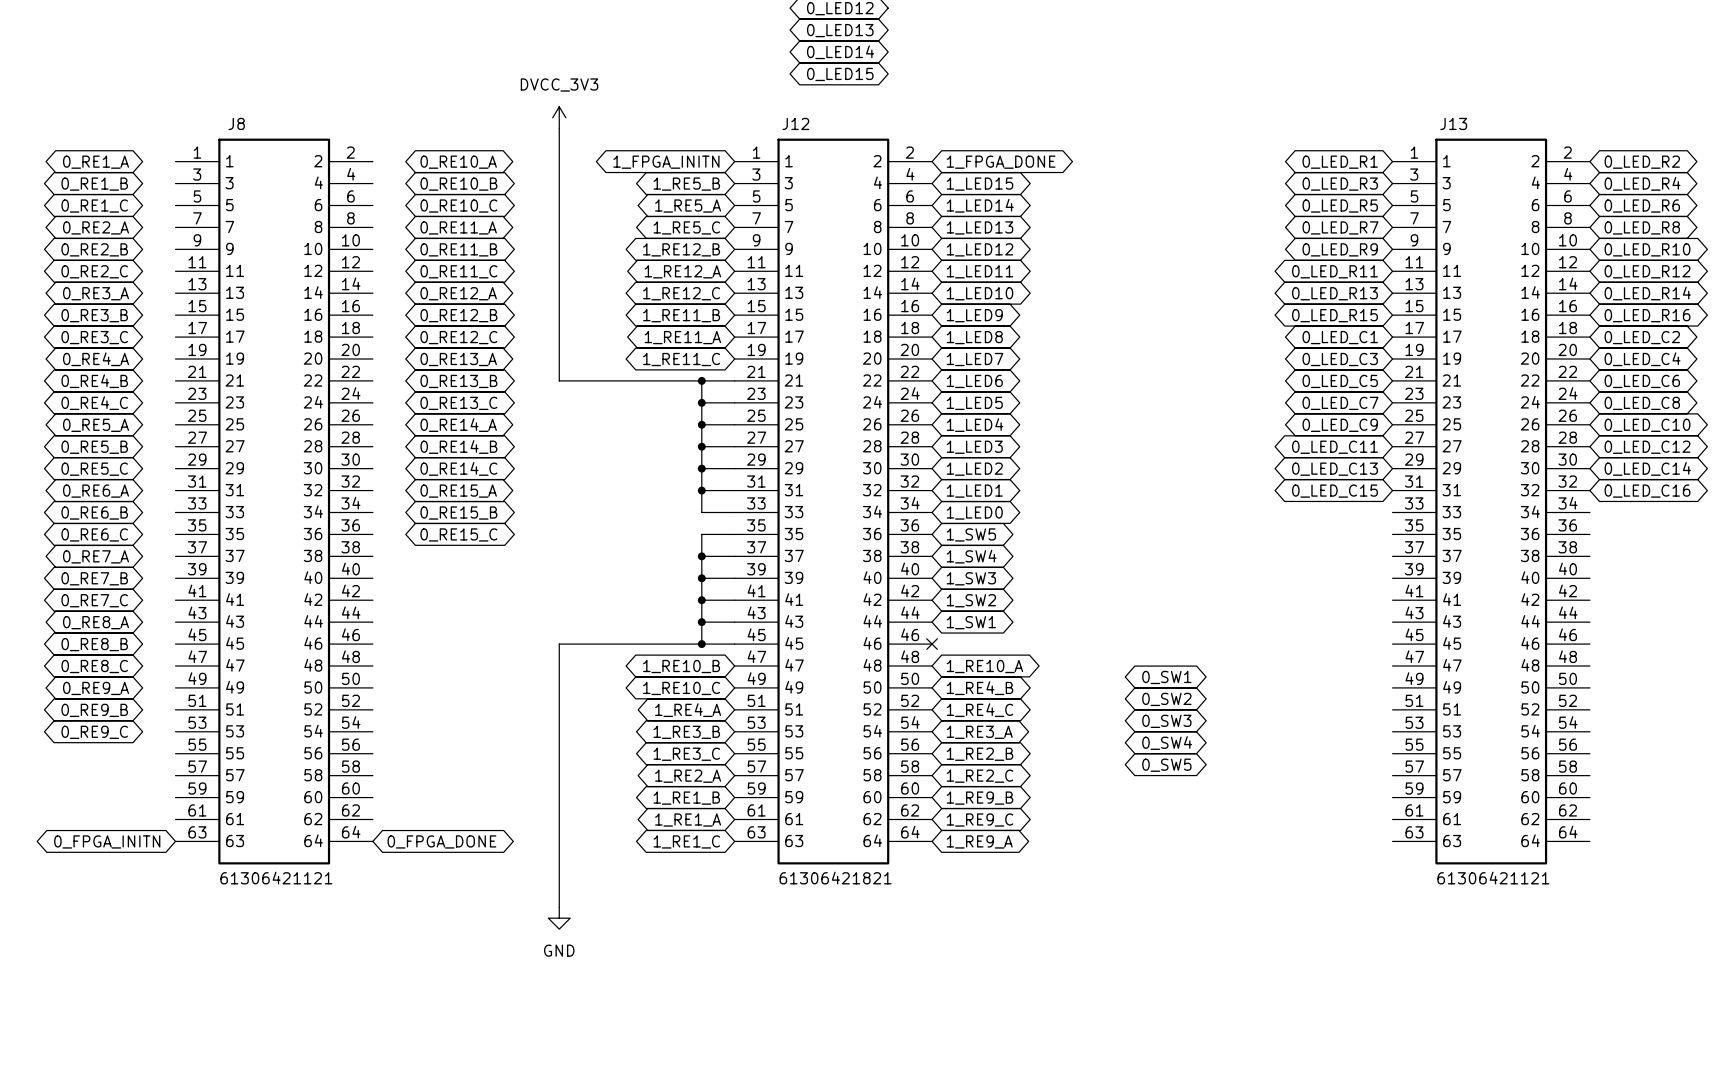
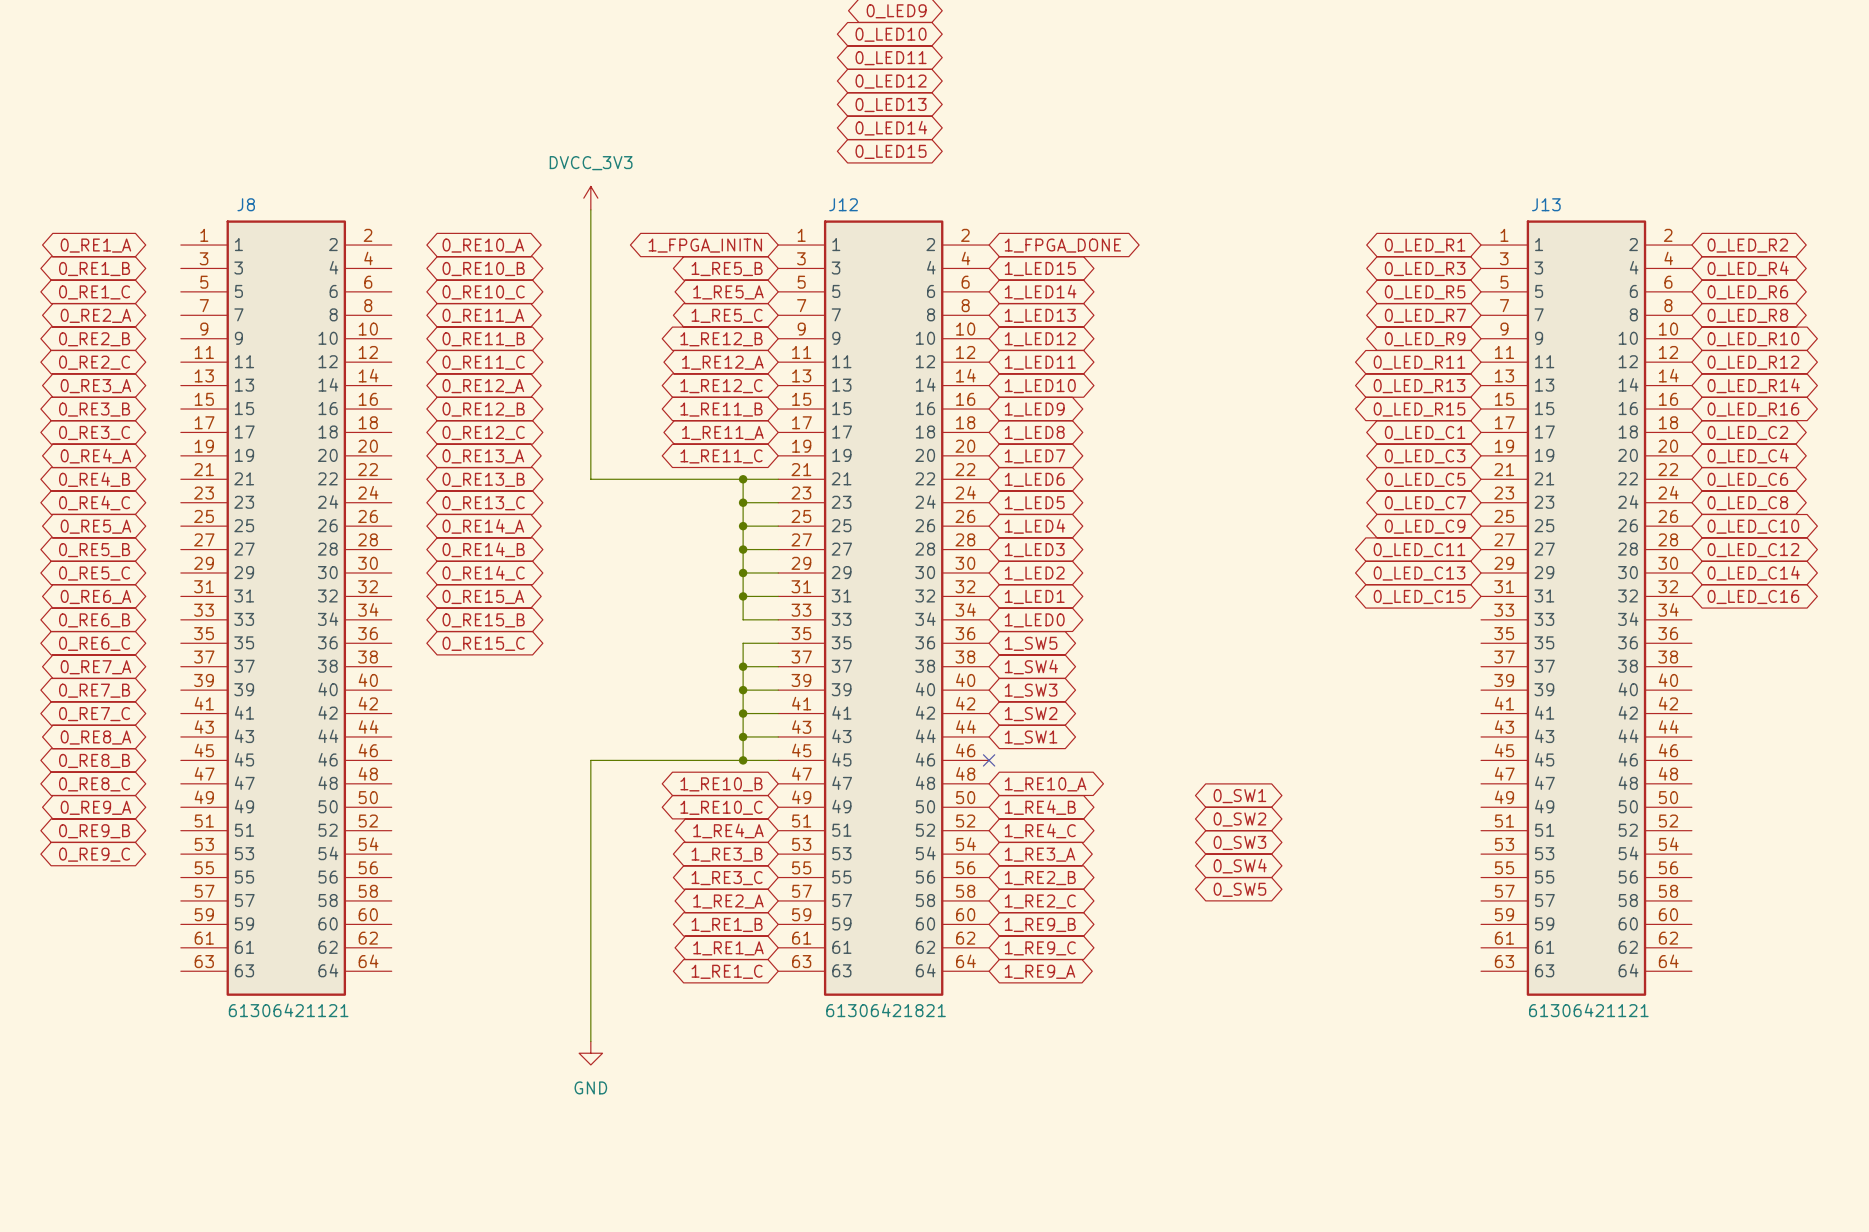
global label: 0_FPGA_INITN (107, 841) -> none
global label: 0_FPGA_DONE (441, 841) -> none

